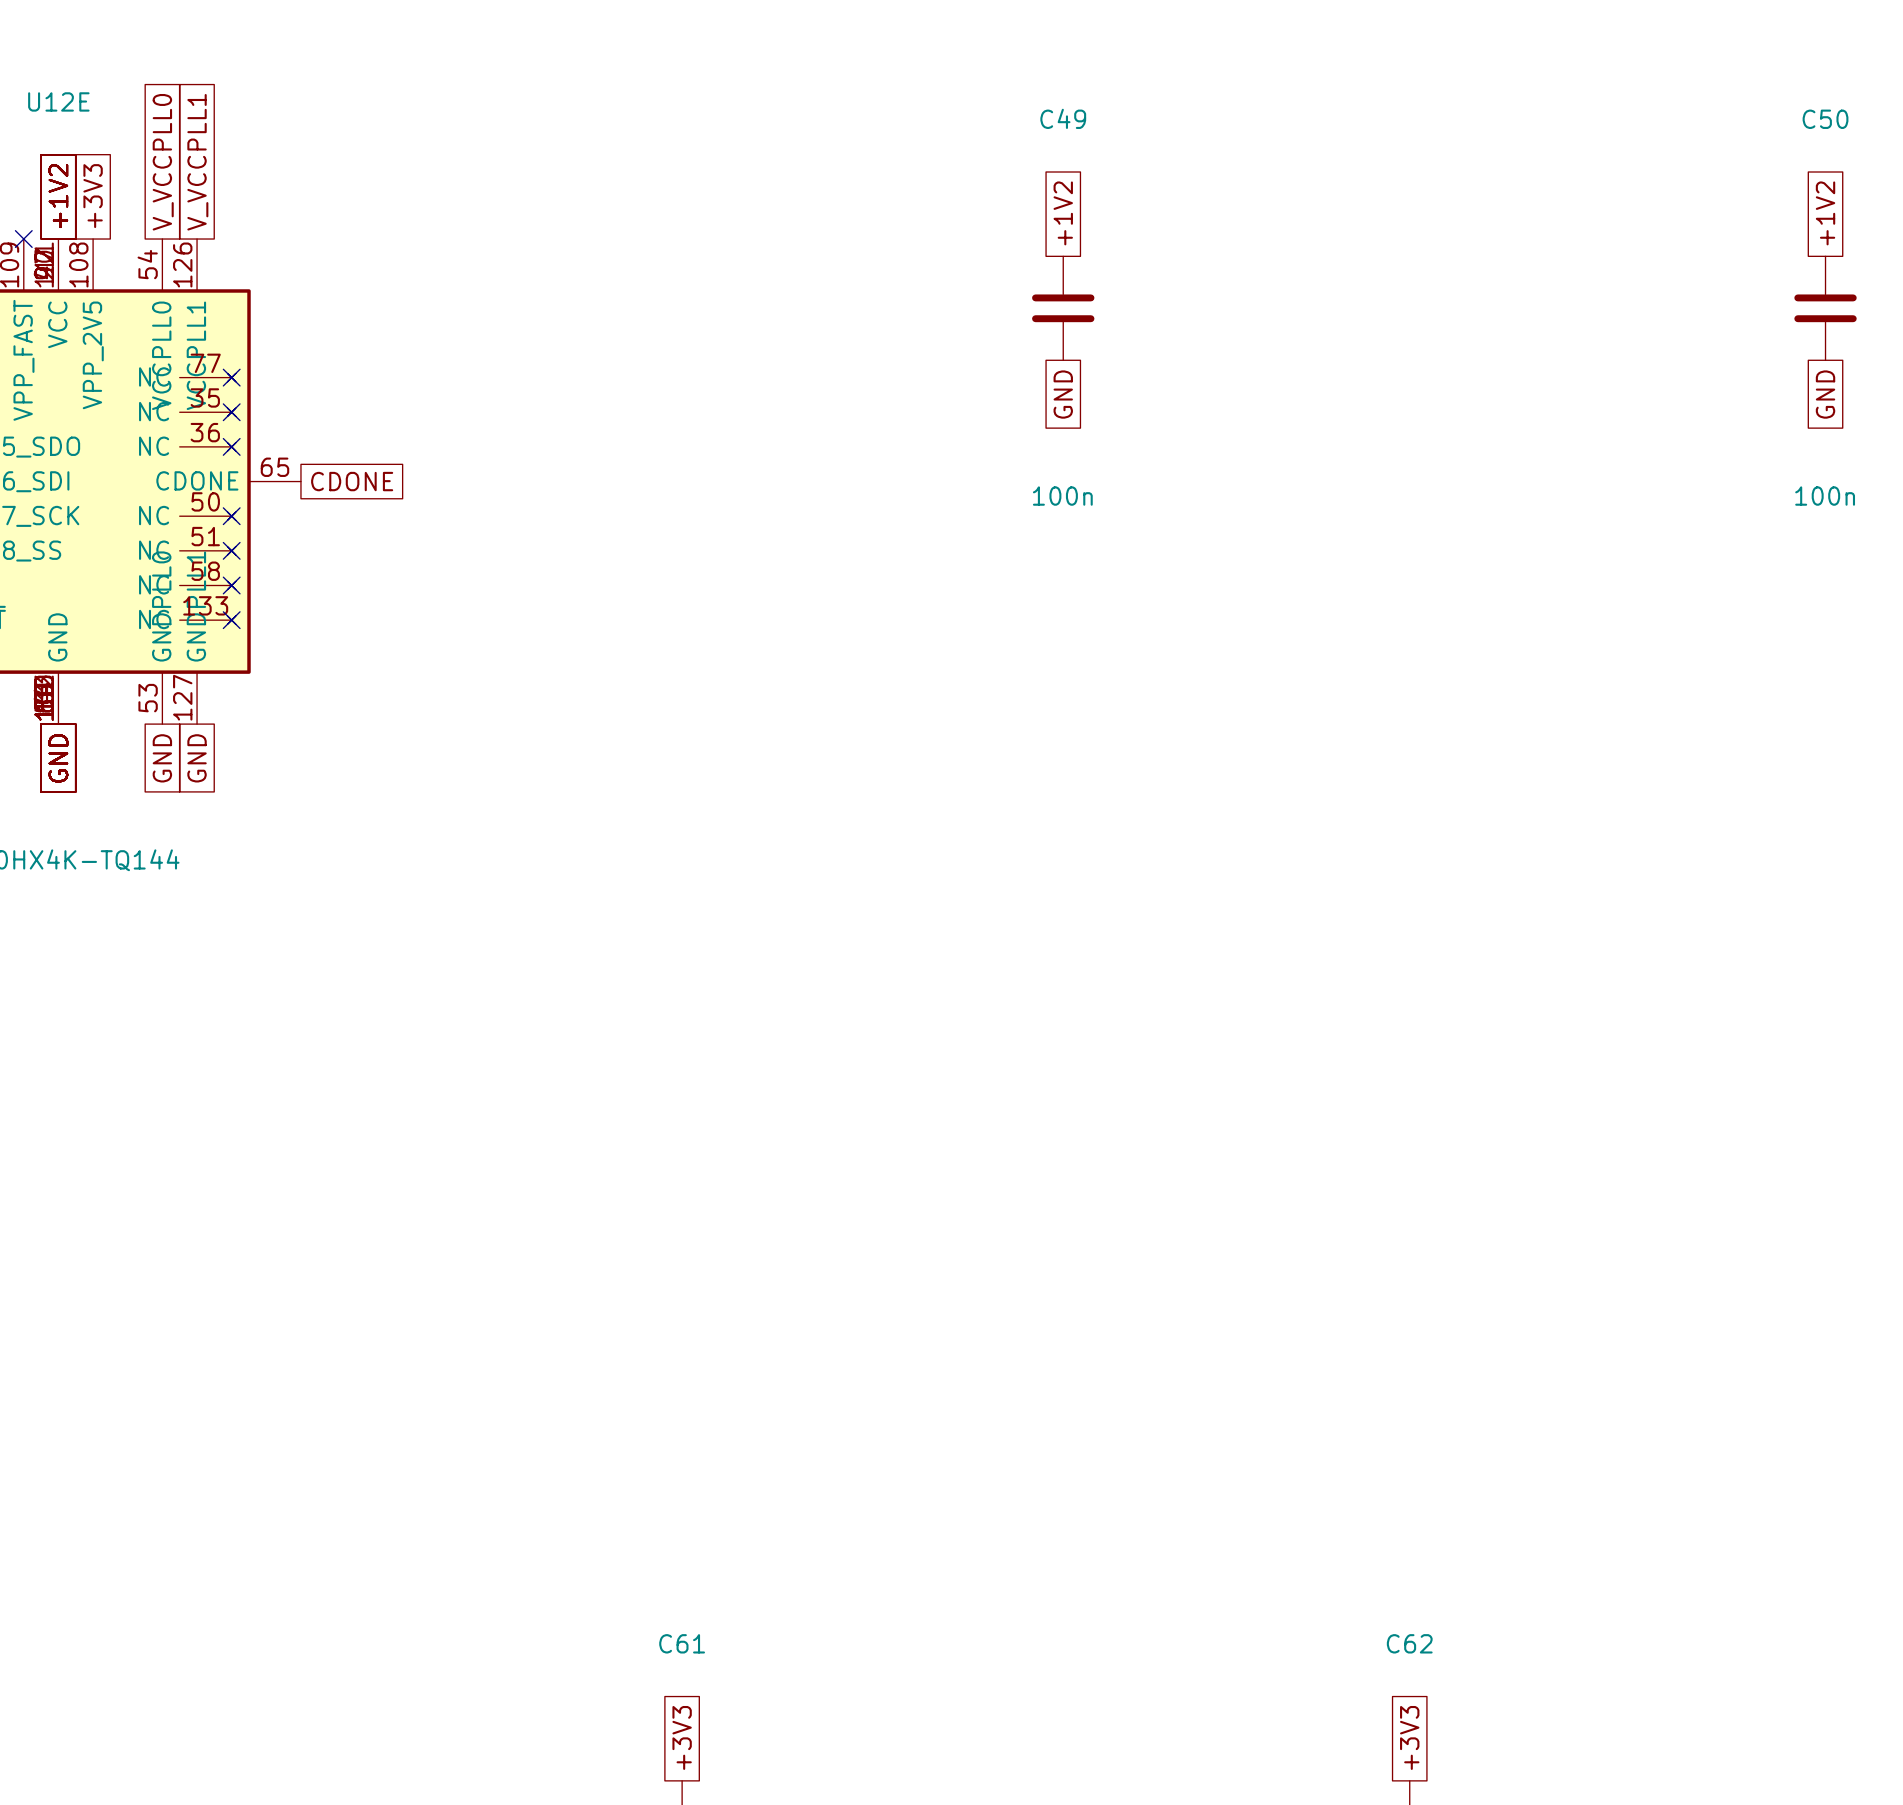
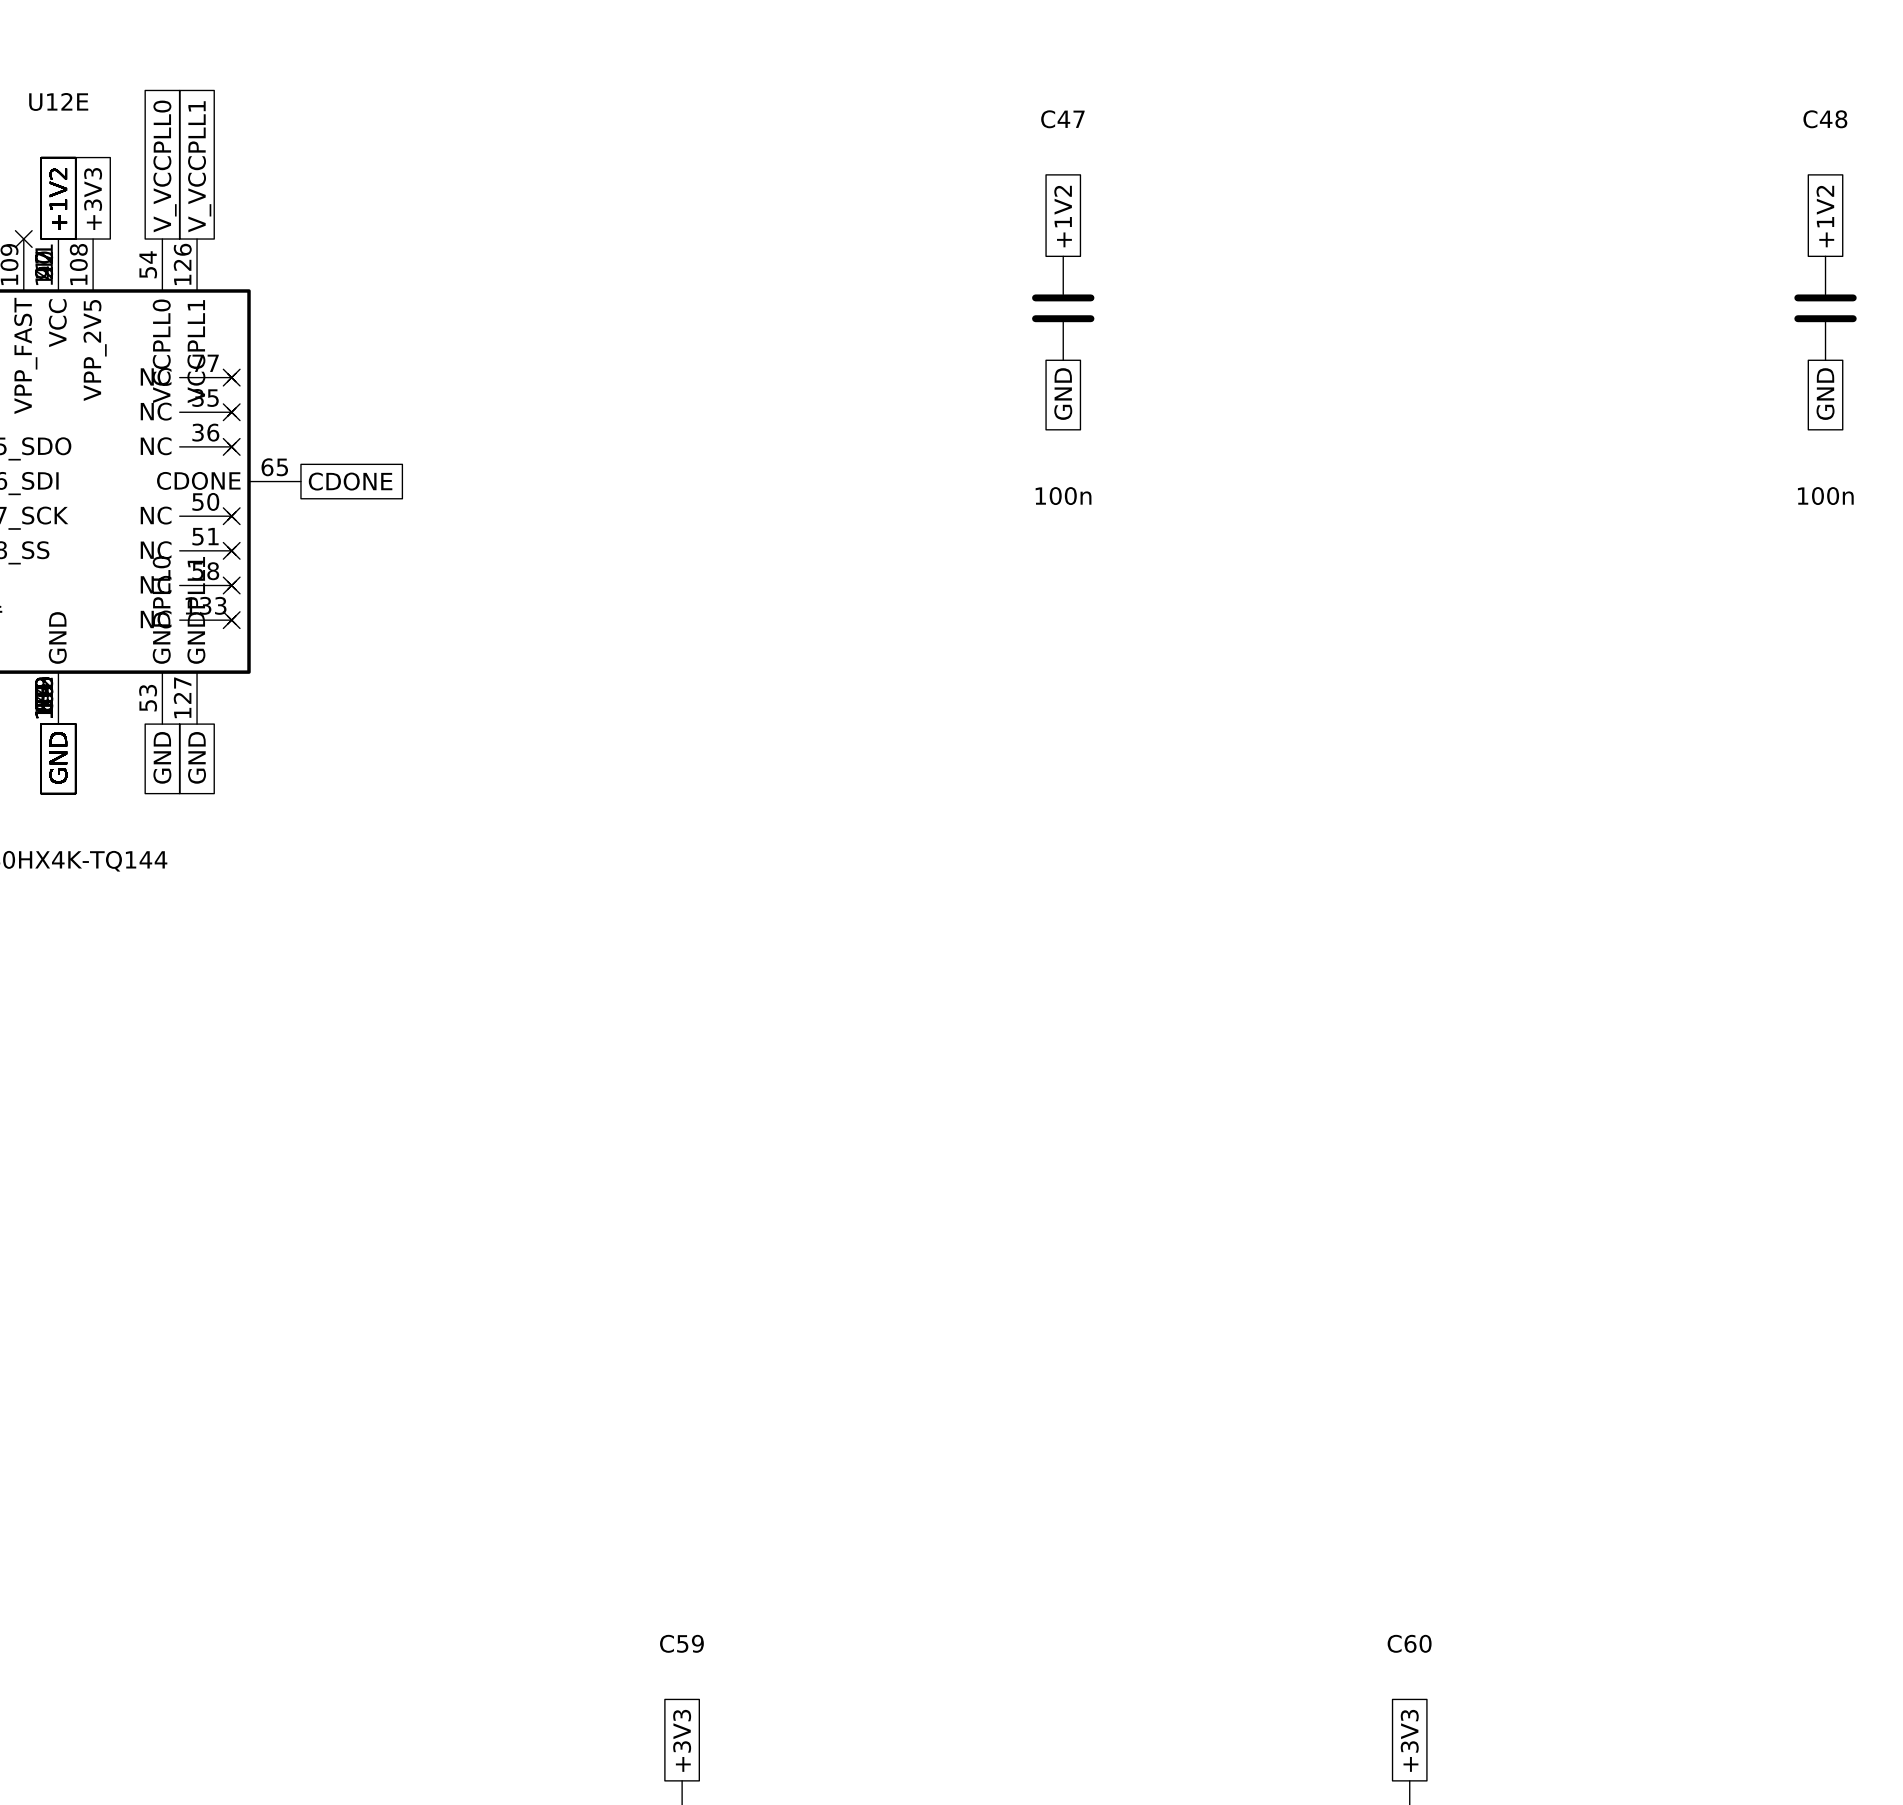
C49 name: C49 (1063, 118) -> C47 (1062, 119)
C50 name: C50 (1825, 119) -> C48 (1825, 119)
C61 name: C61 (682, 1643) -> C59 (681, 1643)
C62 name: C62 (1409, 1643) -> C60 (1409, 1643)

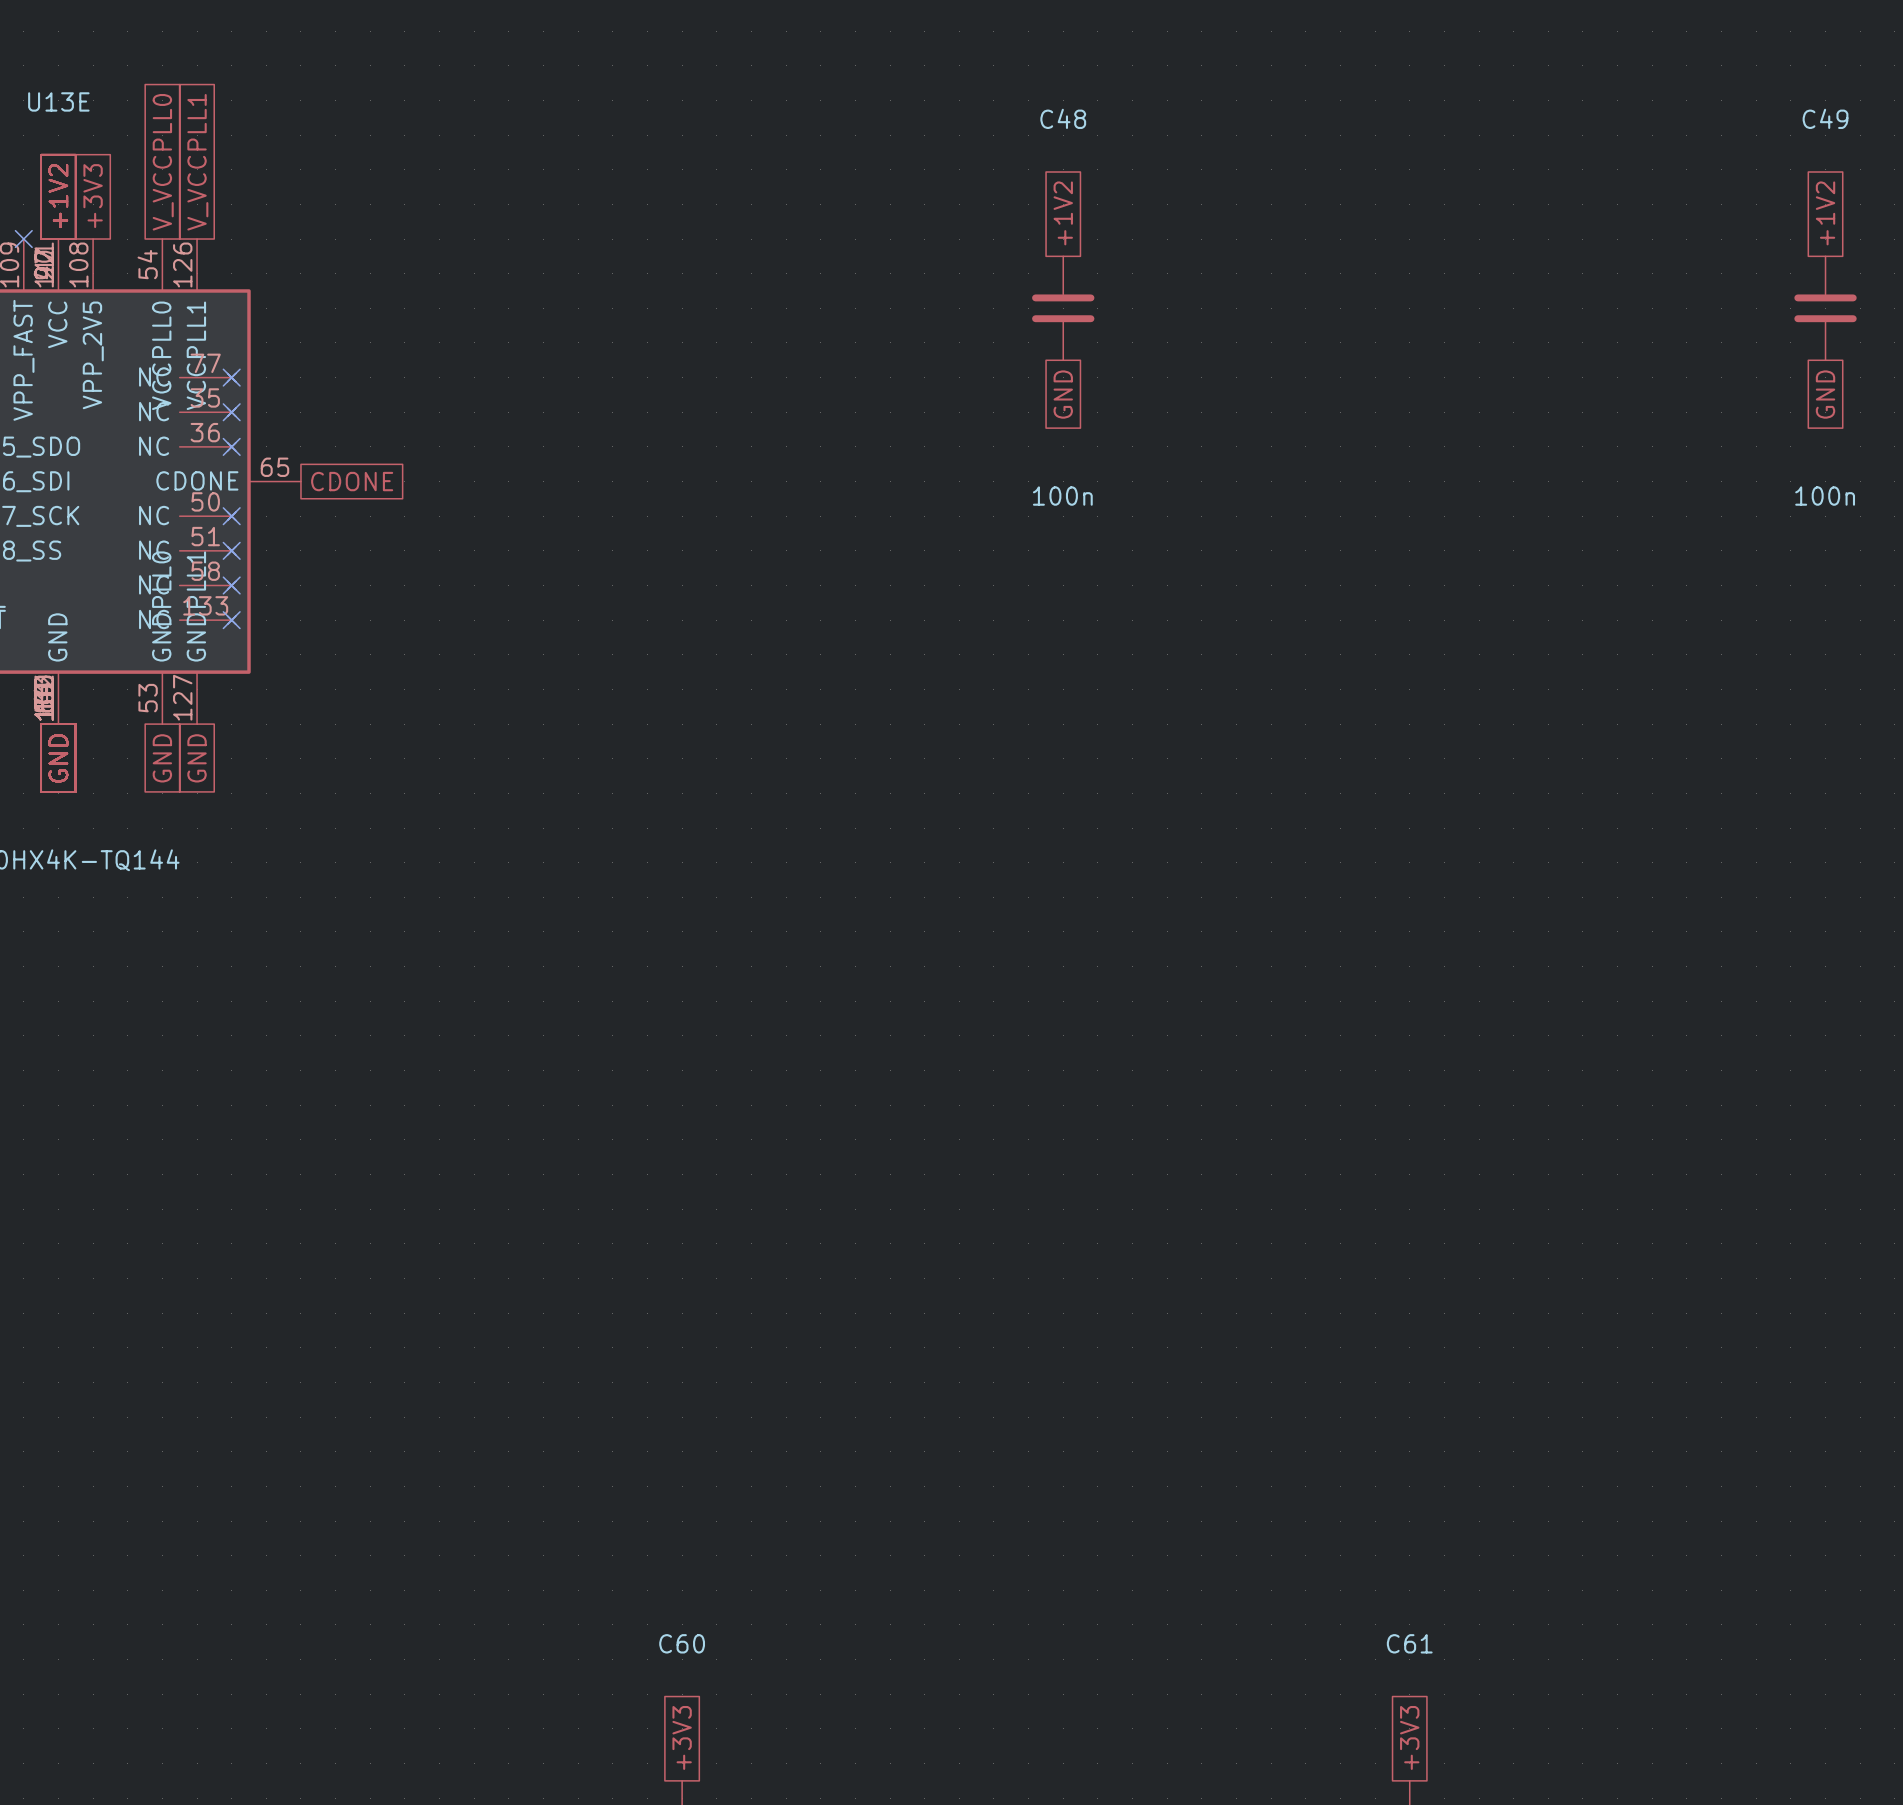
U12E name: U12E (58, 101) -> U13E (58, 101)
C47 name: C47 (1062, 119) -> C48 (1063, 118)
C48 name: C48 (1825, 119) -> C49 (1825, 118)
C59 name: C59 (681, 1643) -> C60 (682, 1643)
C60 name: C60 (1409, 1643) -> C61 (1409, 1643)

